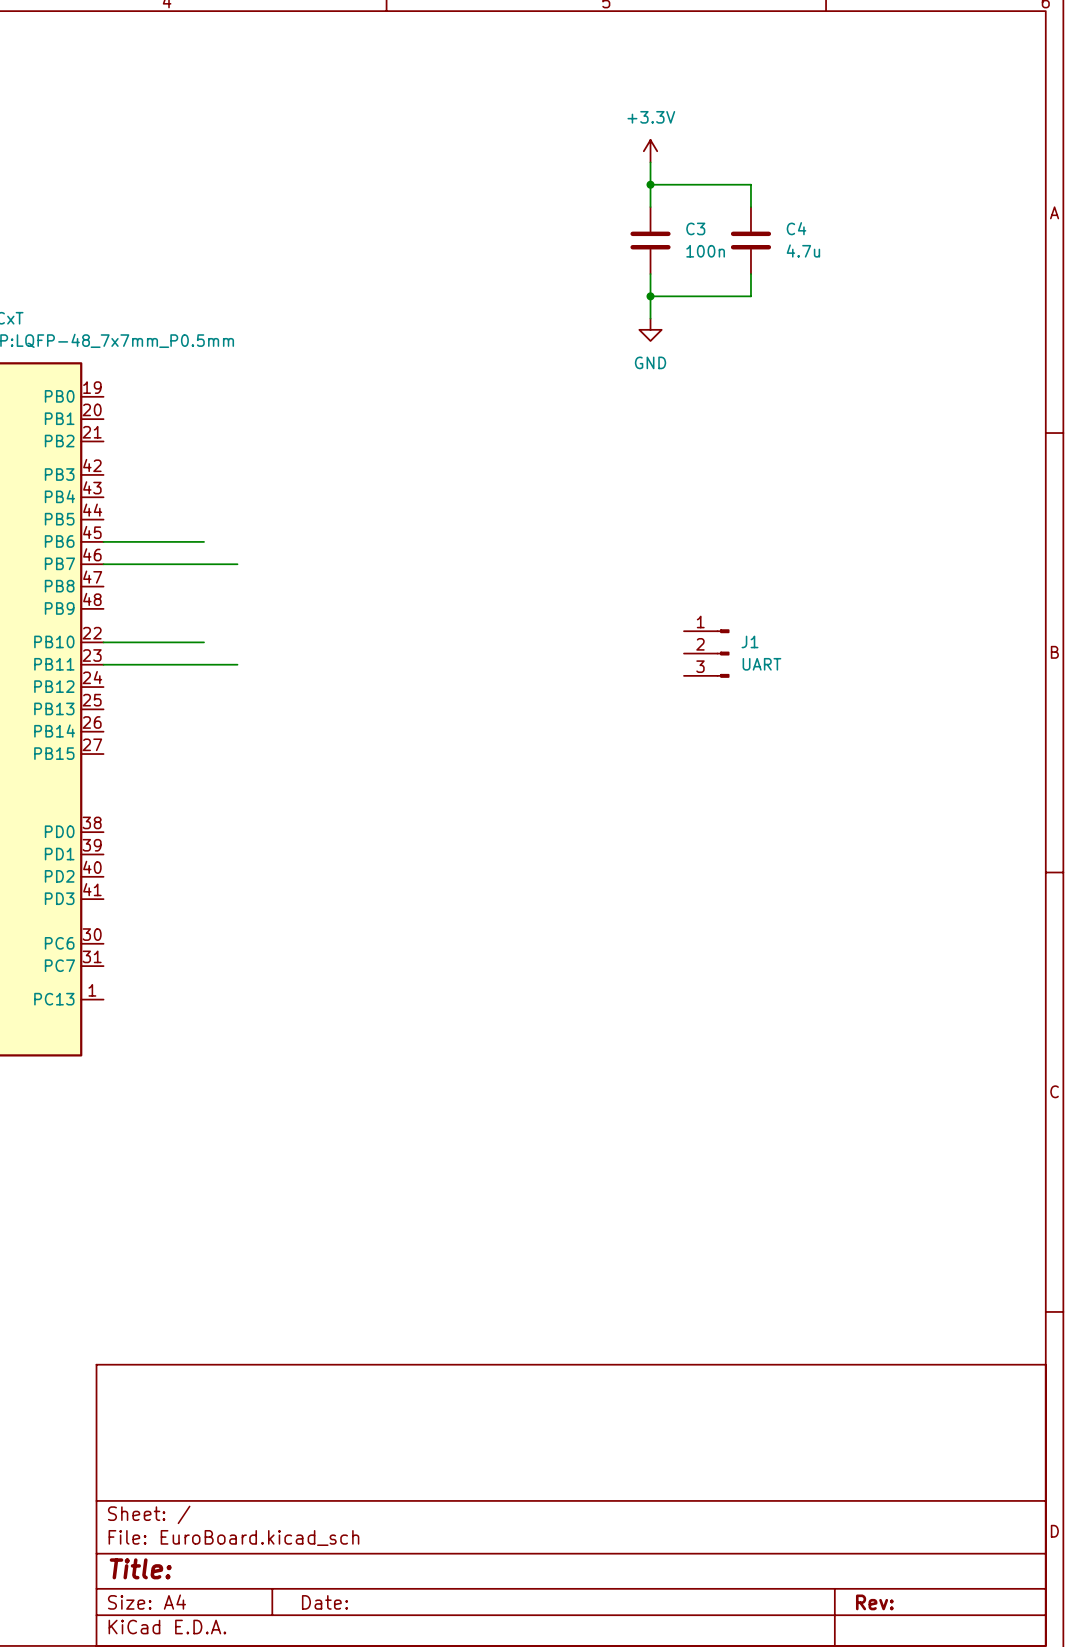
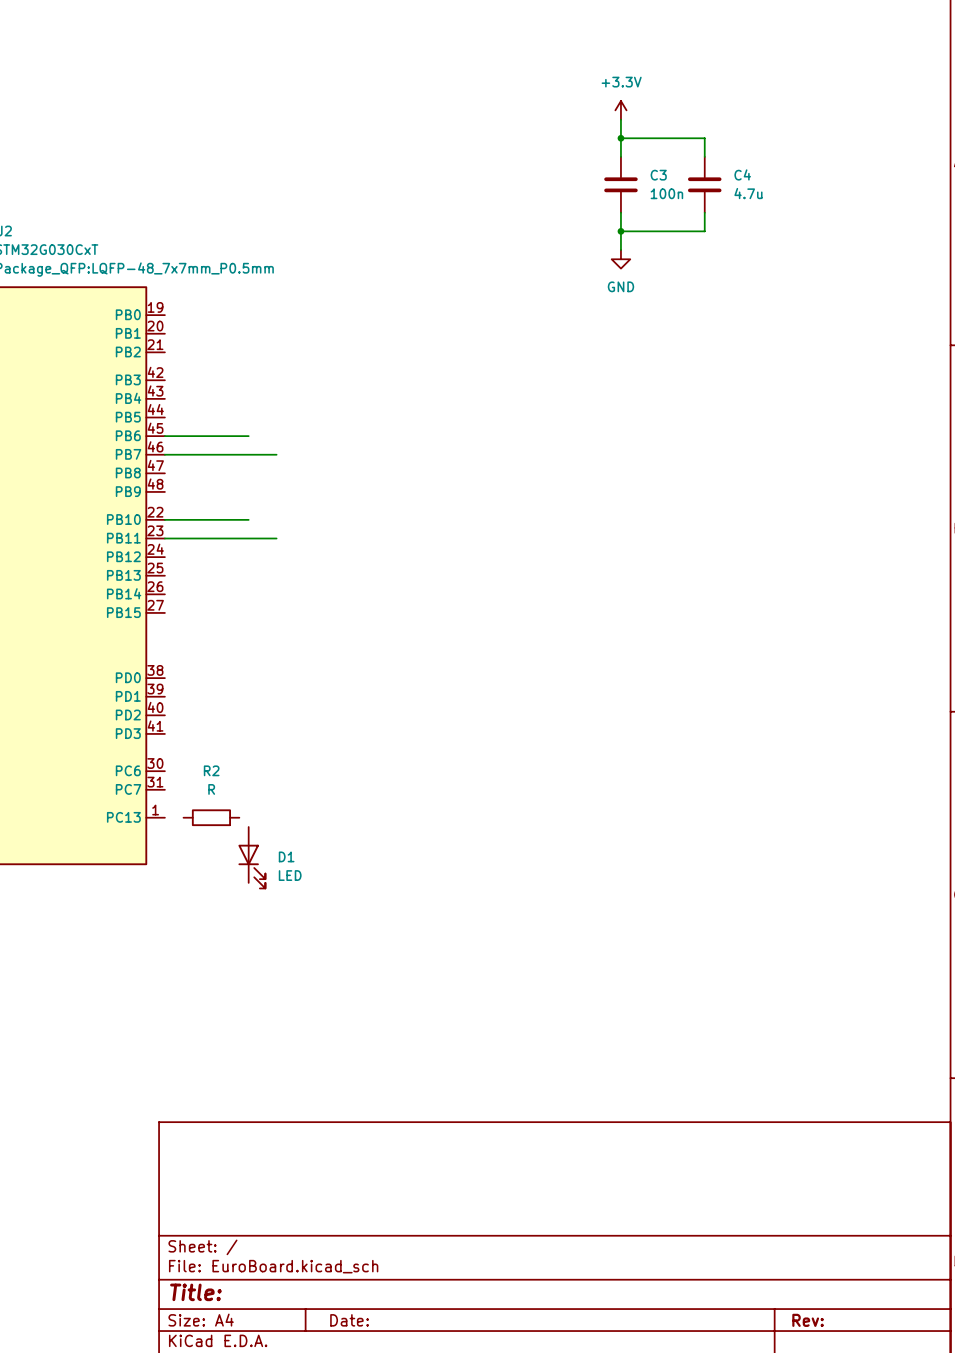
J1: UART (706, 653) -> none
R2: none -> R (211, 817)
D1: none -> LED (251, 857)

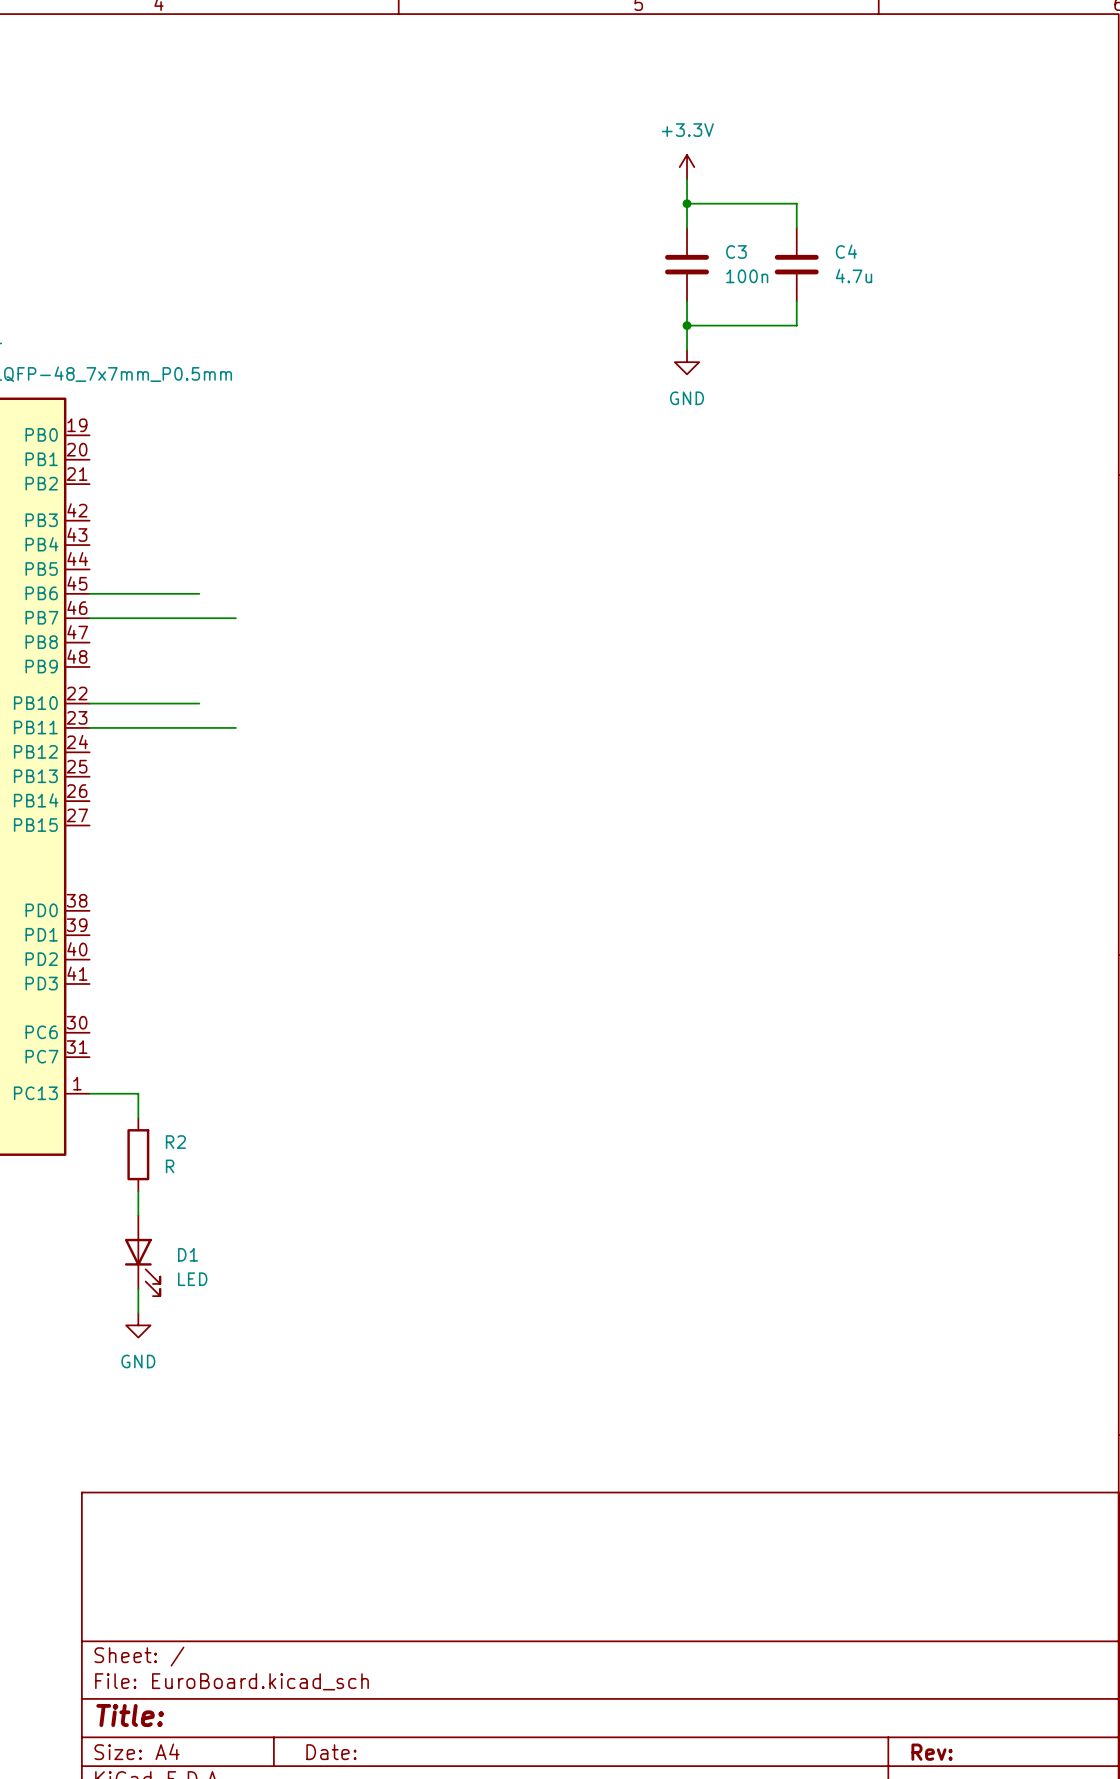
R2 name position: R2 (211, 770) -> R2 (175, 1142)
wire: none -> (89, 1093) (138, 1093) (138, 1118)
R2 rotation: 0° (211, 817) -> 90° clockwise (138, 1154)
R2 position: (211, 817) -> (138, 1154)
D1 position: (251, 857) -> (142, 1255)
wire: none -> (138, 1191) (138, 1215)
wire: none -> (138, 1288) (138, 1313)
power symbol: none -> GND (138, 1325)

